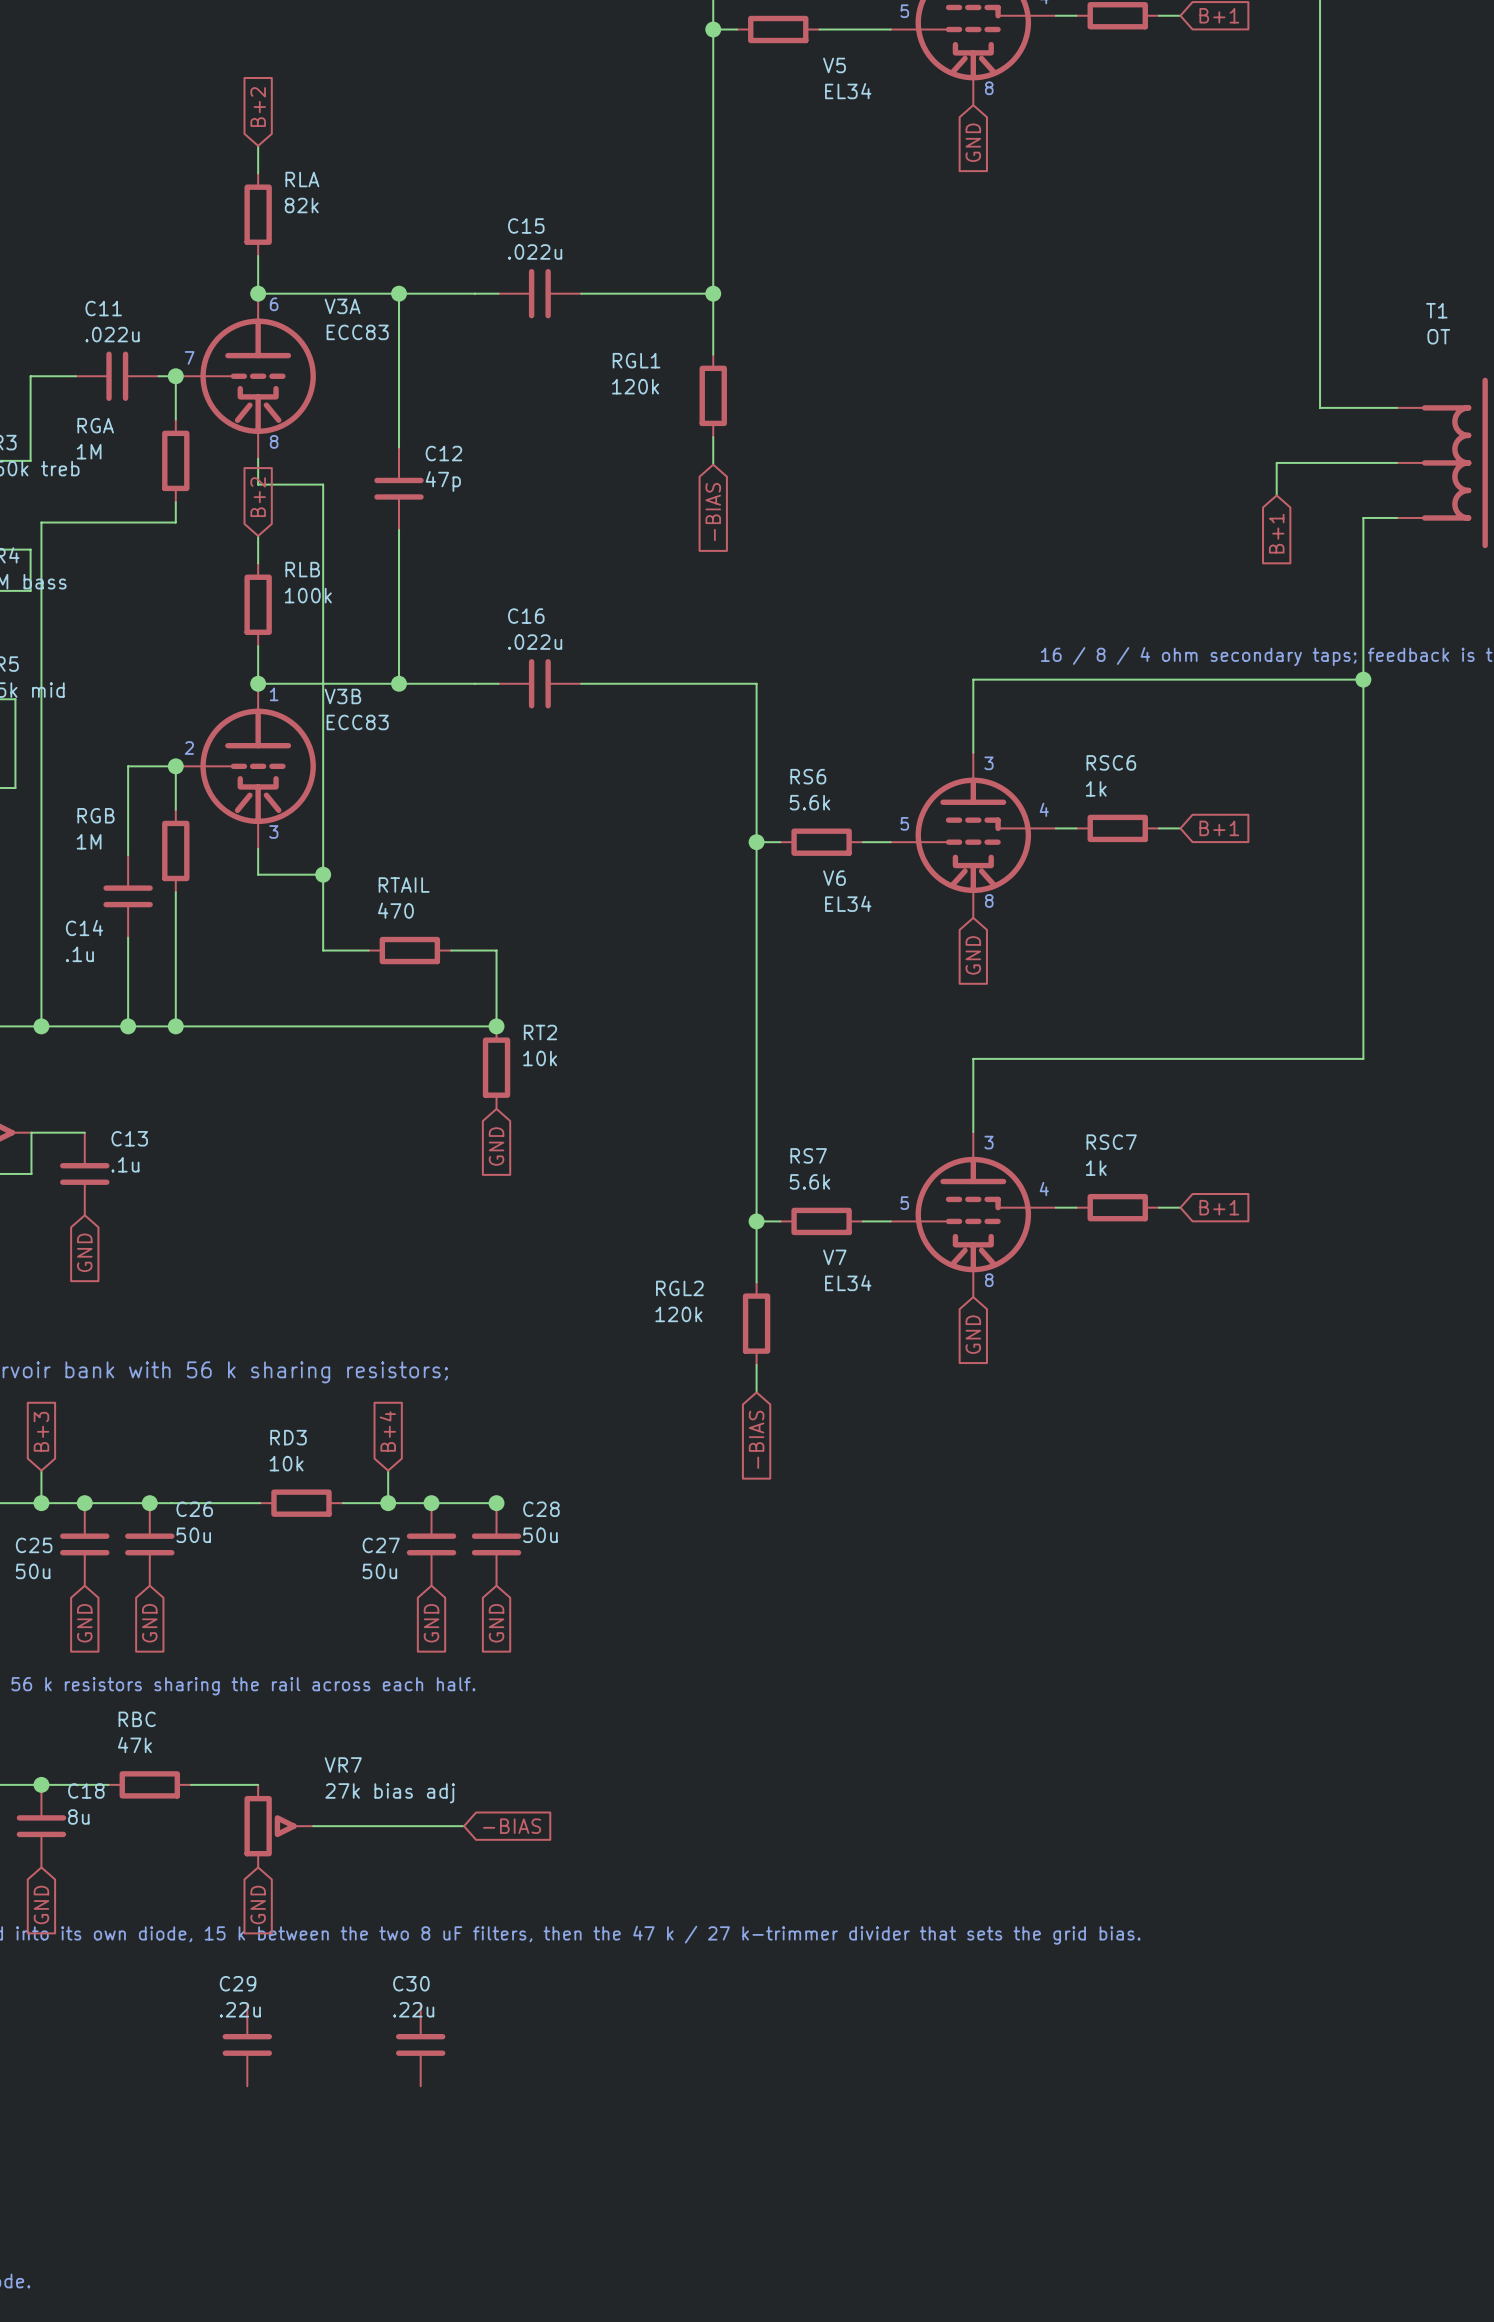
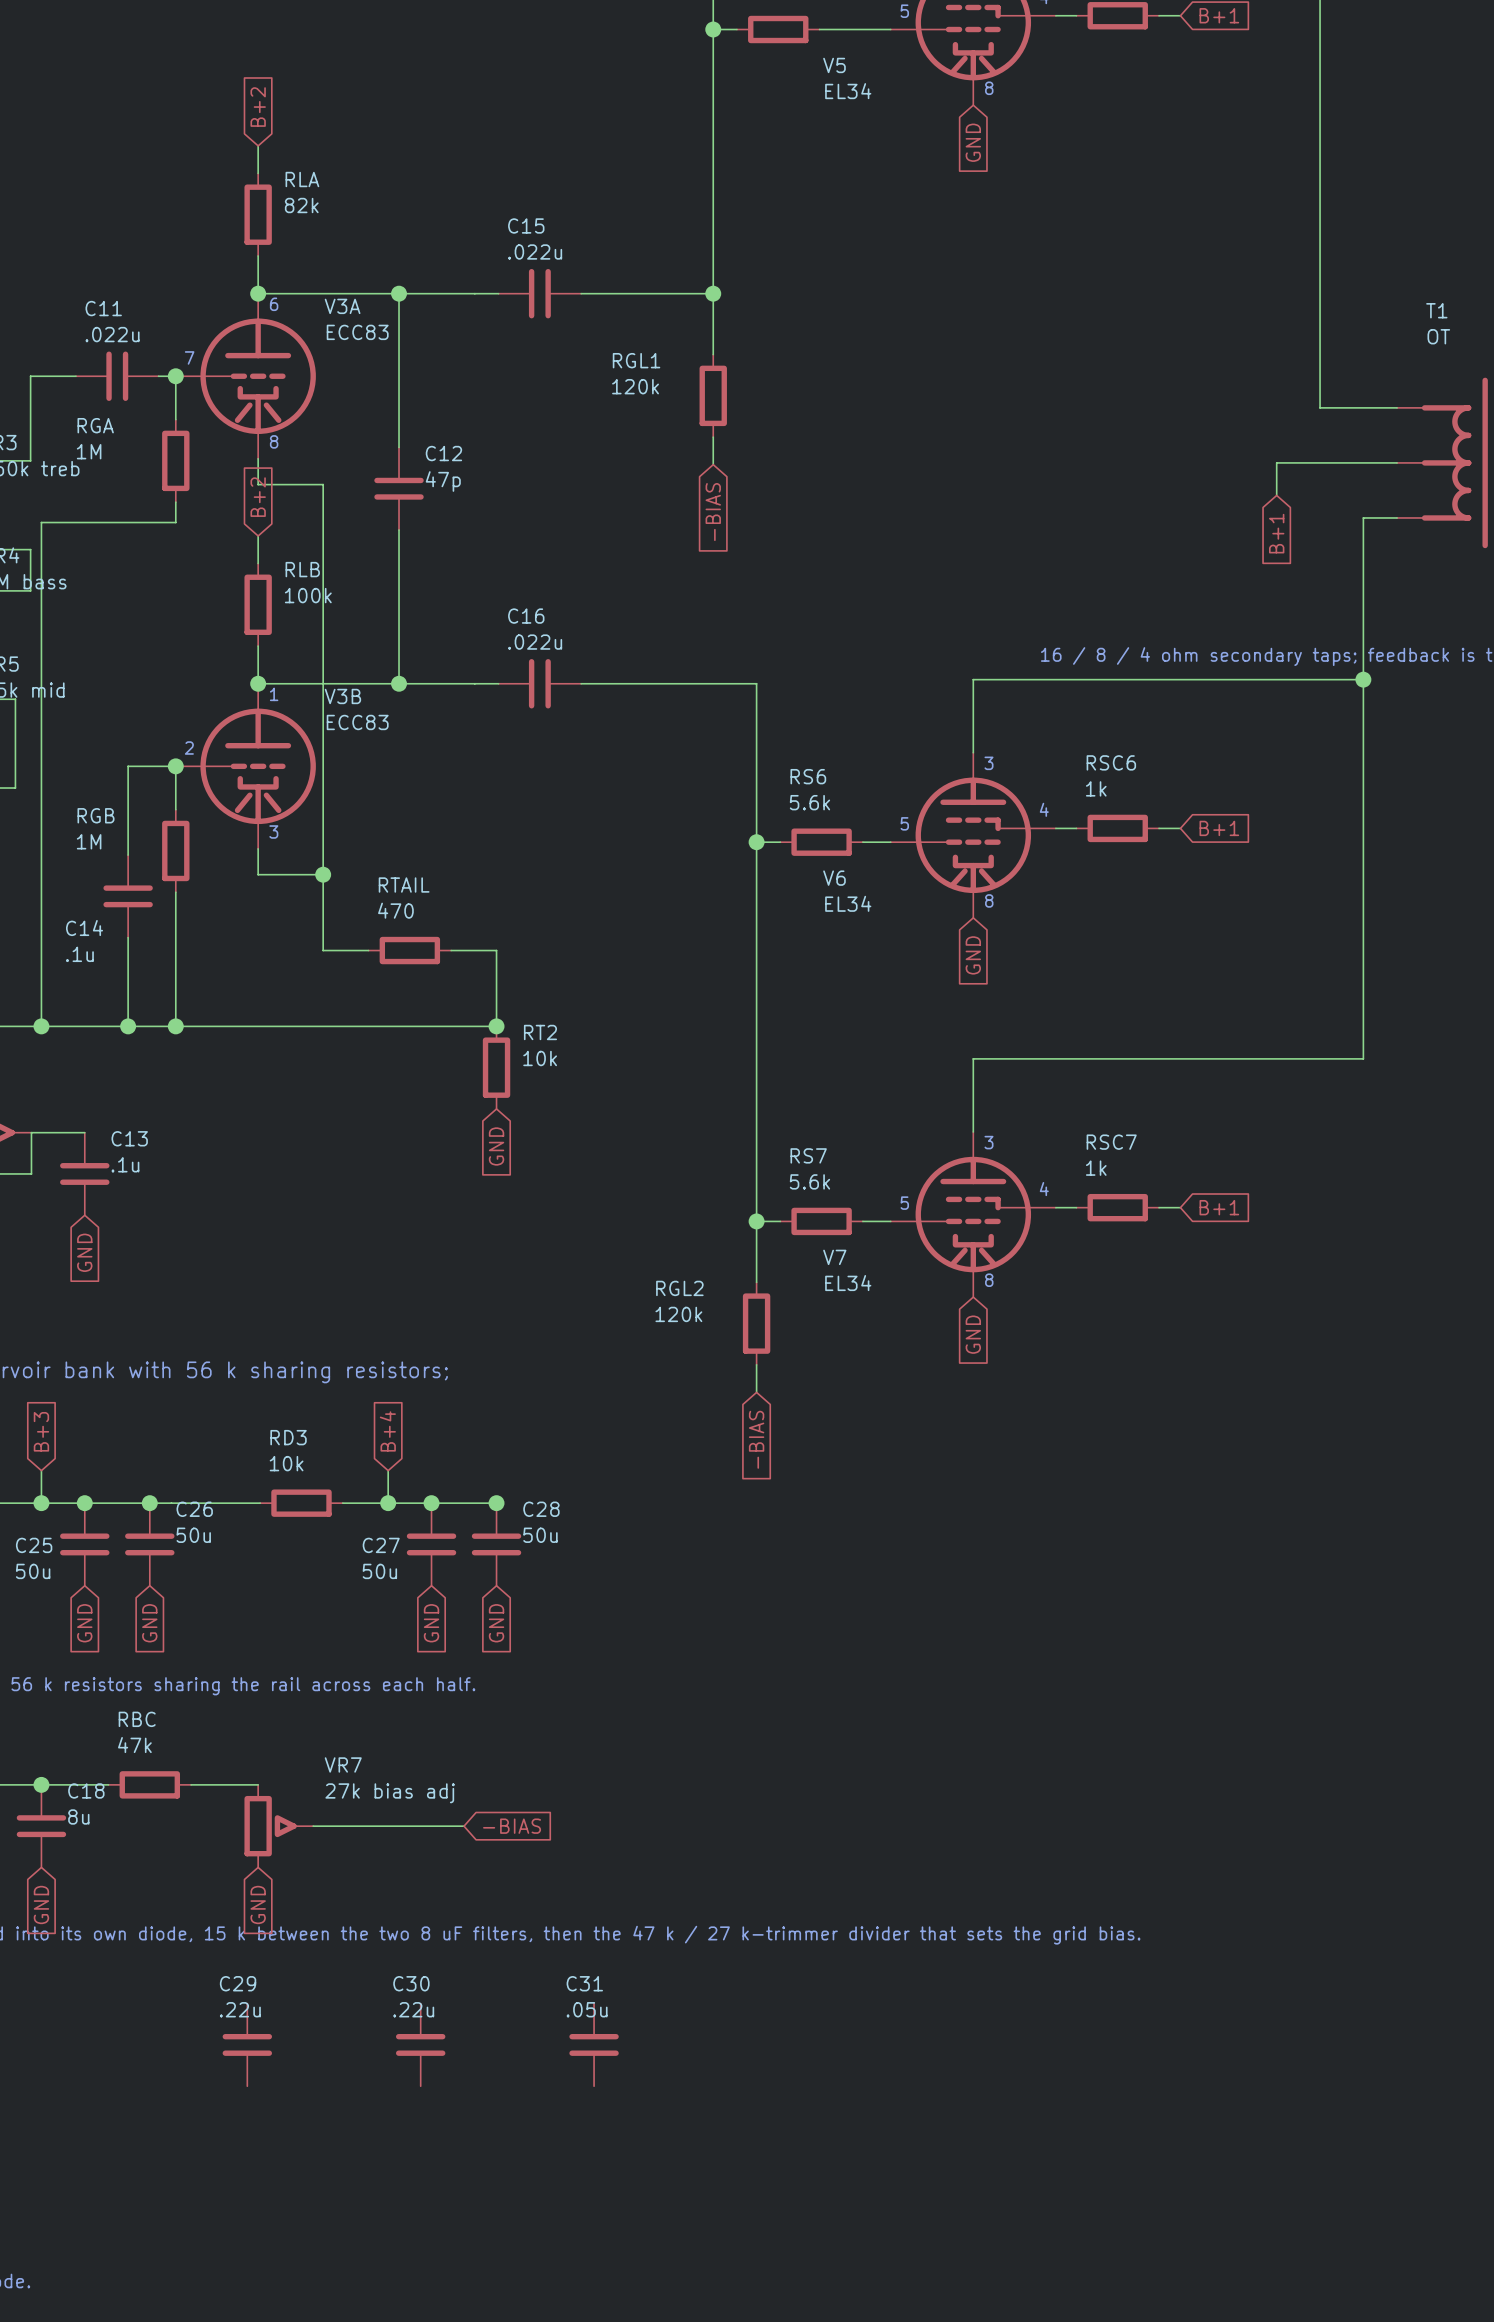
C31: none -> .05u (594, 2044)

